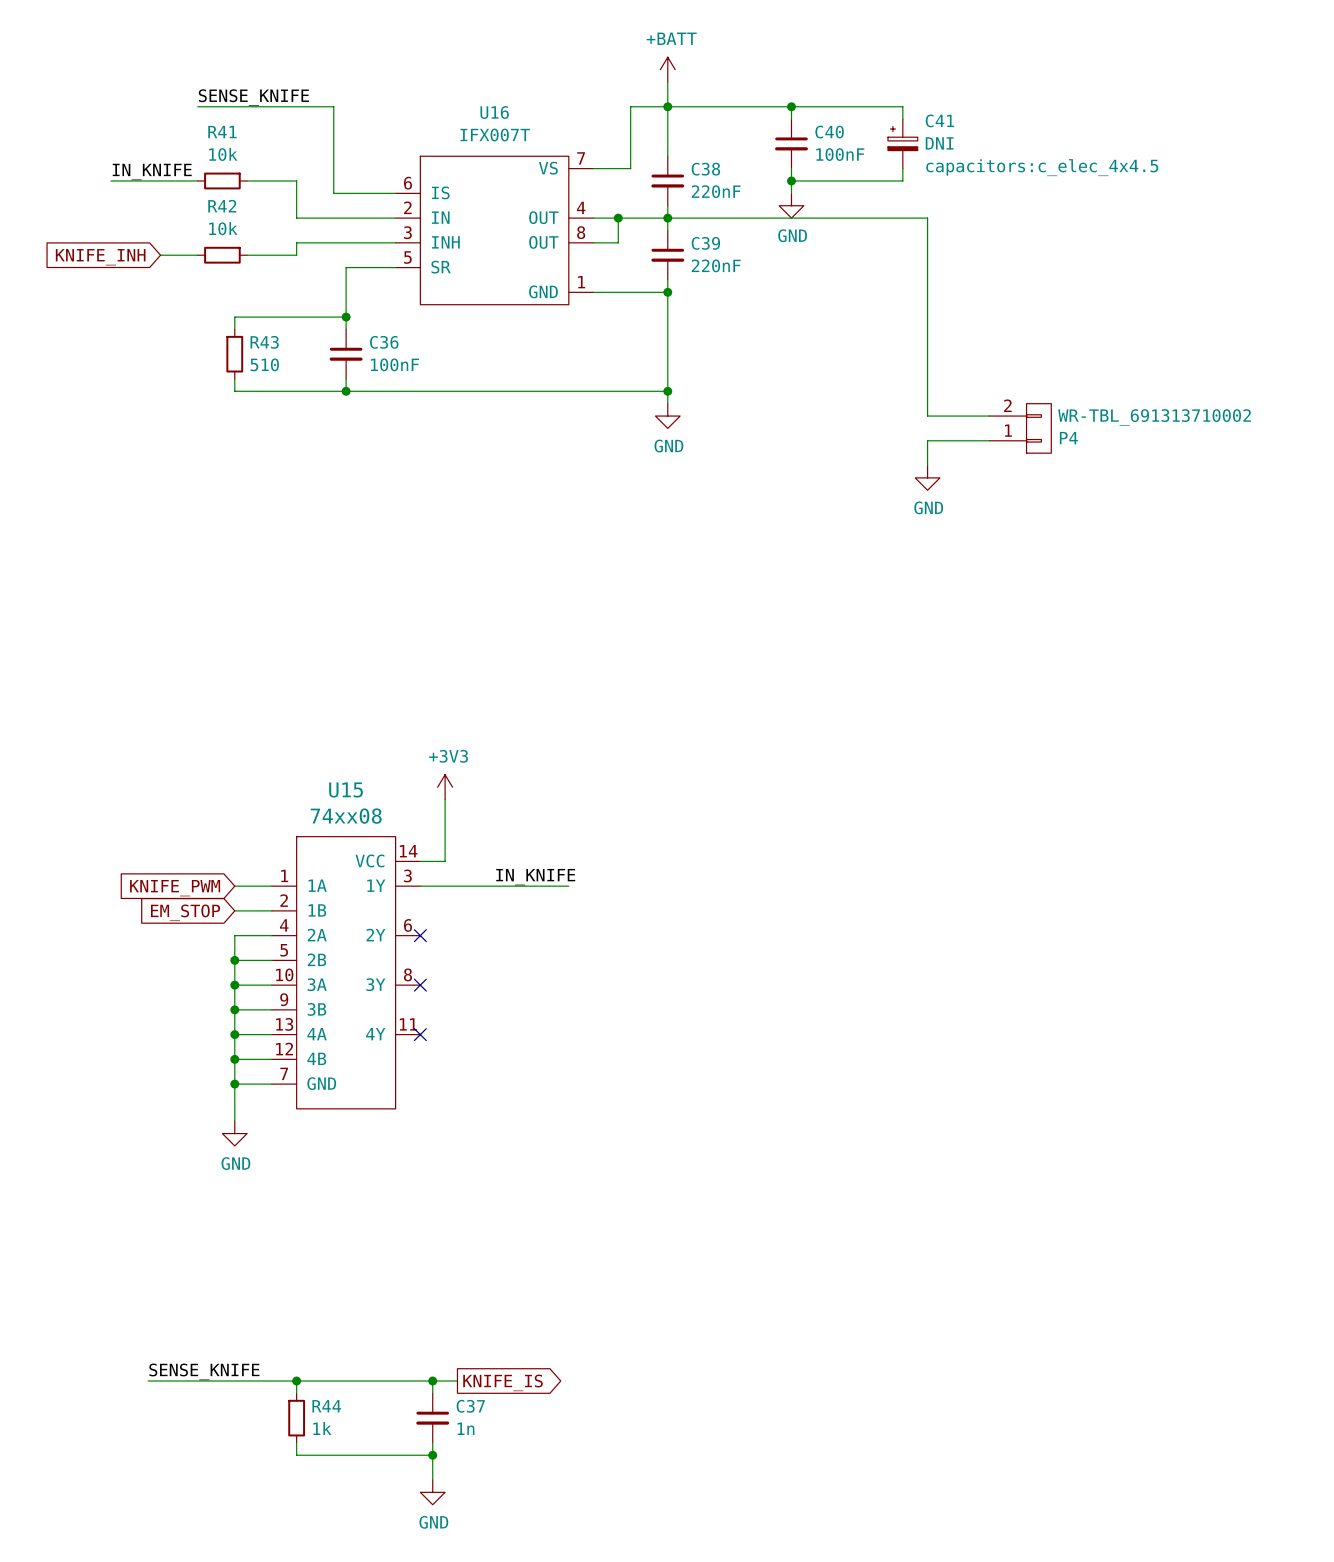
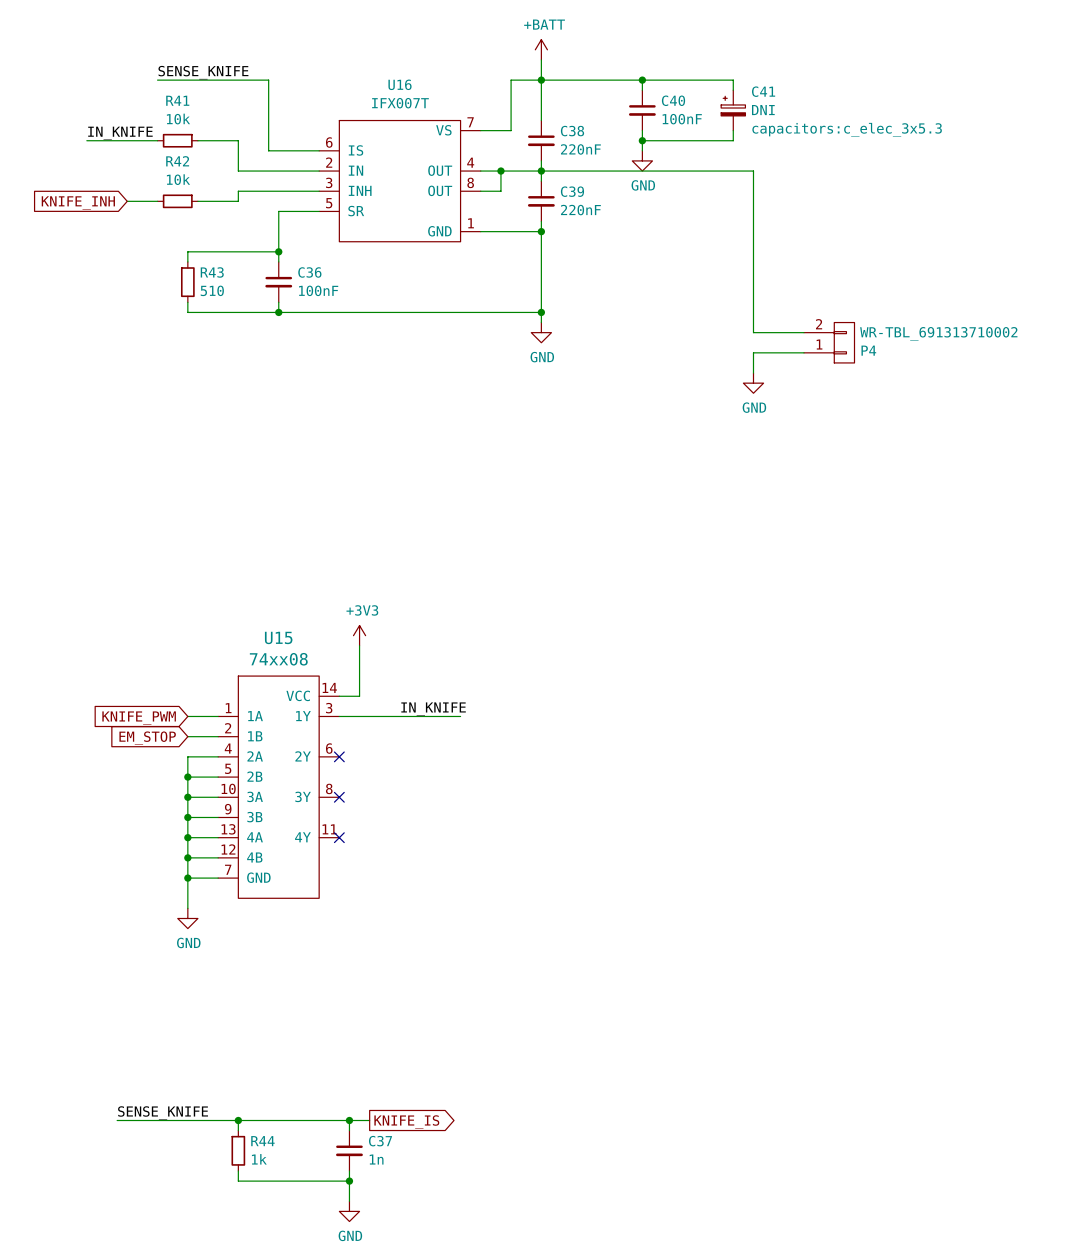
C41 text: capacitors:c_elec_4x4.5 (1042, 167) -> capacitors:c_elec_3x5.3 (847, 129)

